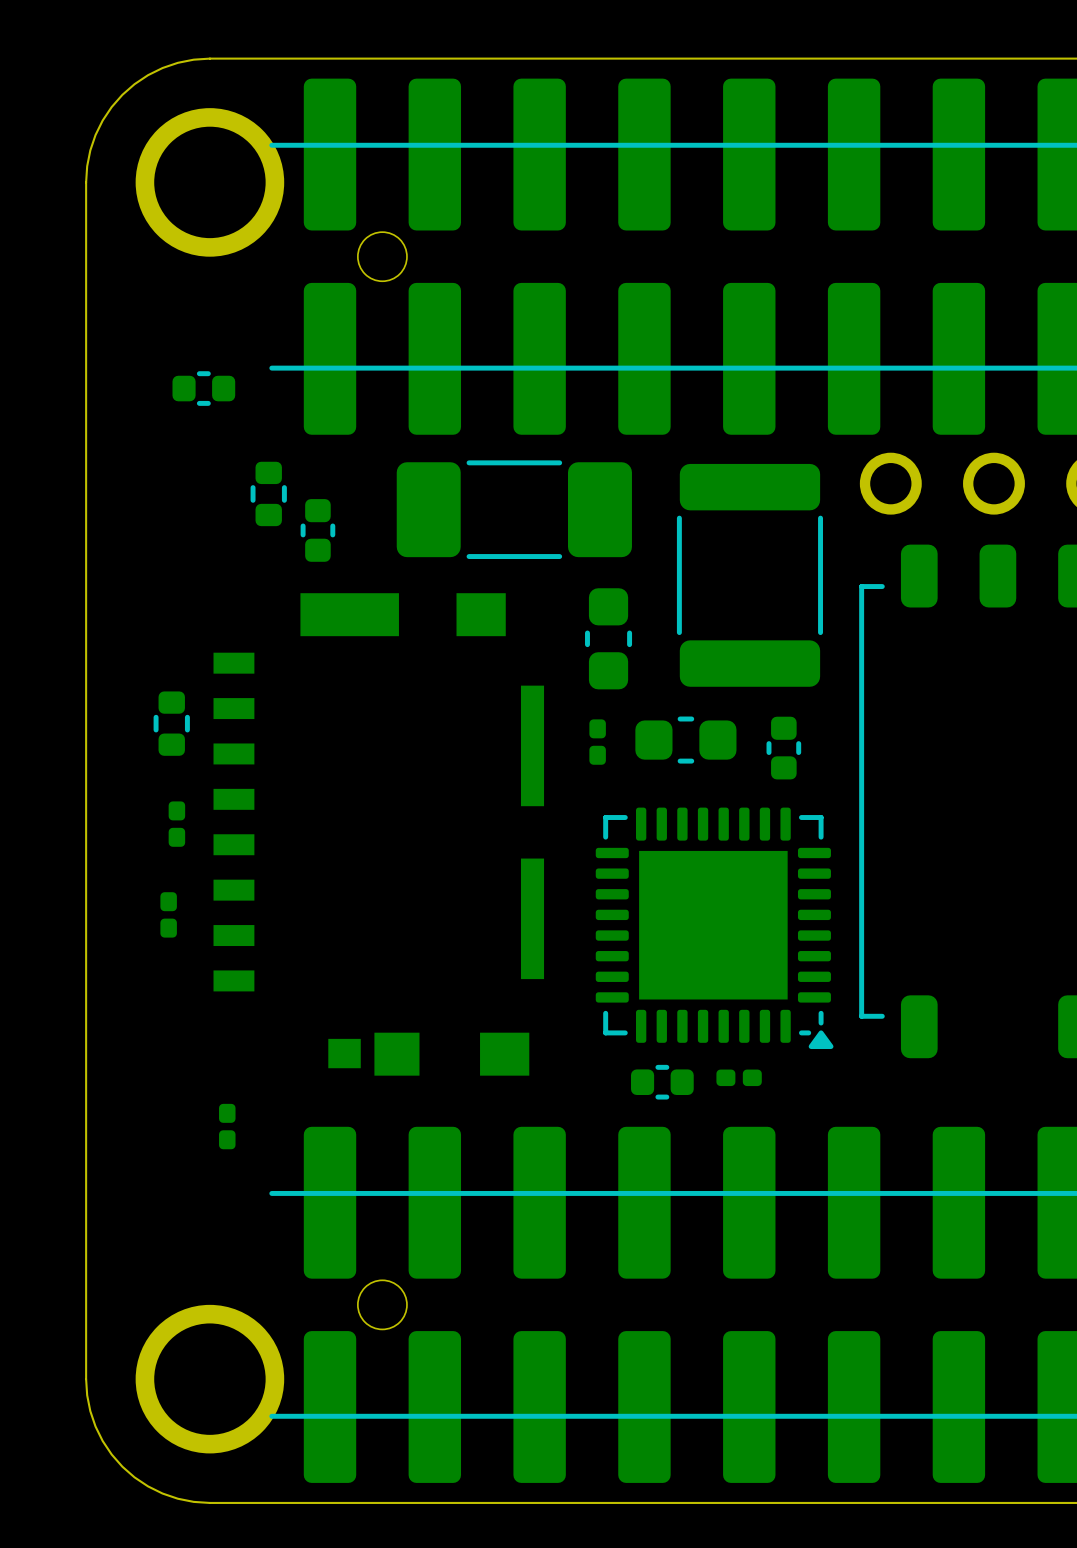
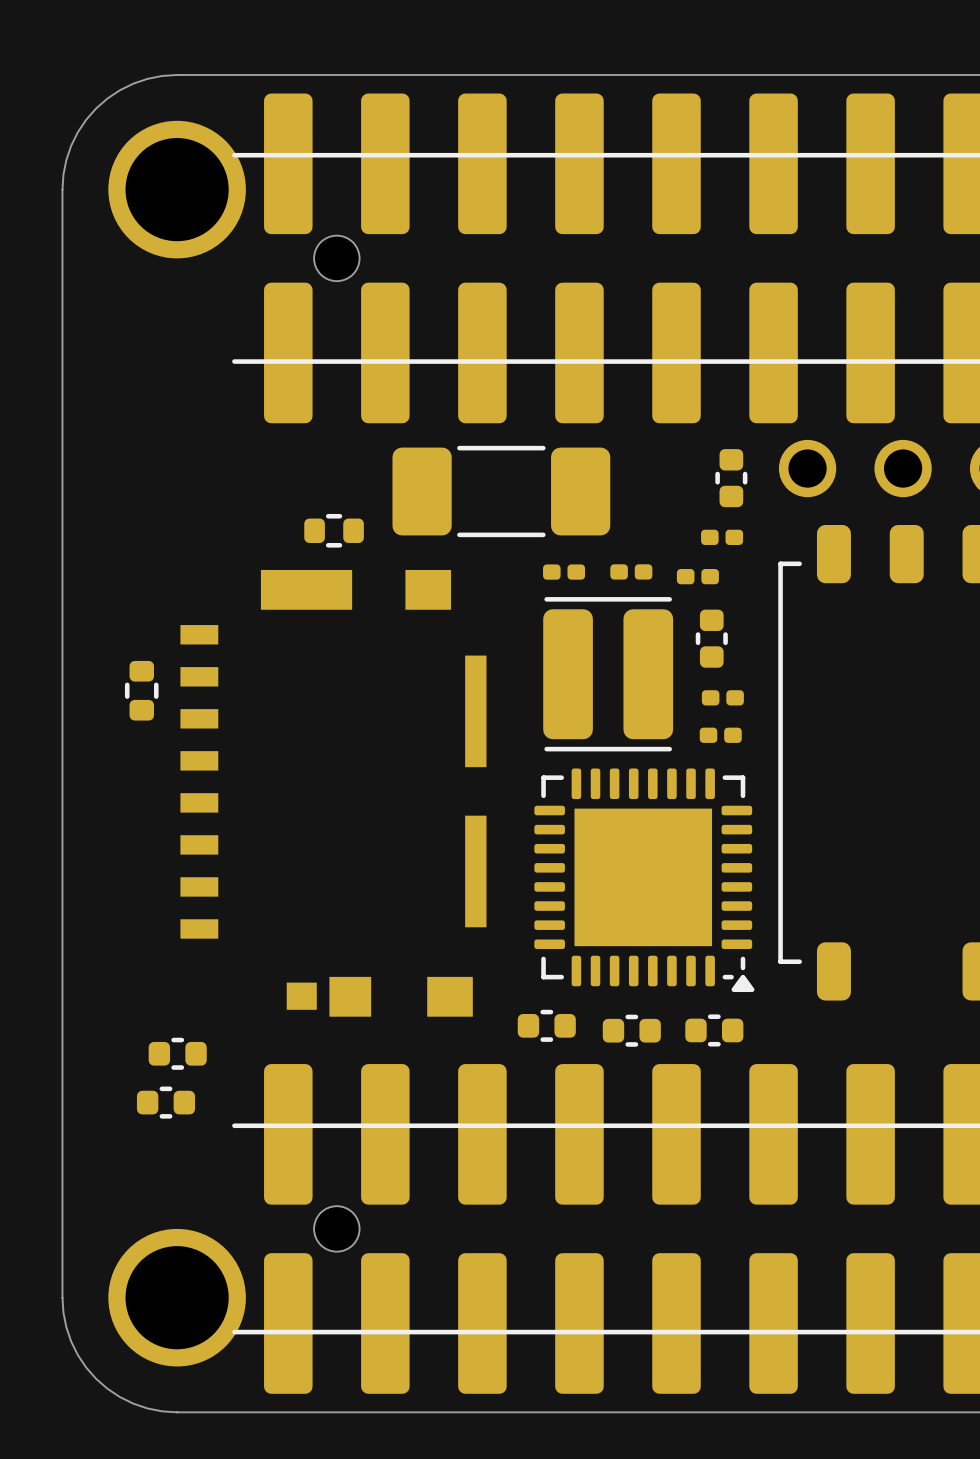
part: (203, 388) -> none
part rotation: 0° (268, 493) -> 90° clockwise (334, 530)
part position: (268, 493) -> (334, 530)
part: none -> (731, 478)
part position: (514, 509) -> (501, 491)
part: (317, 530) -> none
part: none -> (722, 537)
part: (749, 575) -> none
part: none -> (564, 572)
part: none -> (631, 571)
part: none -> (697, 576)
part: (608, 638) -> none
part footprint: [635, 716, 737, 764] -> [543, 597, 674, 752]
part: none -> (722, 697)
part: (597, 742) -> none
part position: (783, 748) -> (711, 638)
part: none -> (720, 735)
part: (176, 824) -> none
part: (168, 914) -> none
part: (739, 1077) -> none
part: (662, 1082) -> none
part: none -> (546, 1025)
part: none -> (631, 1030)
part: none -> (714, 1030)
part footprint: [219, 1103, 236, 1150] -> [148, 1037, 207, 1070]
part: none -> (165, 1102)

